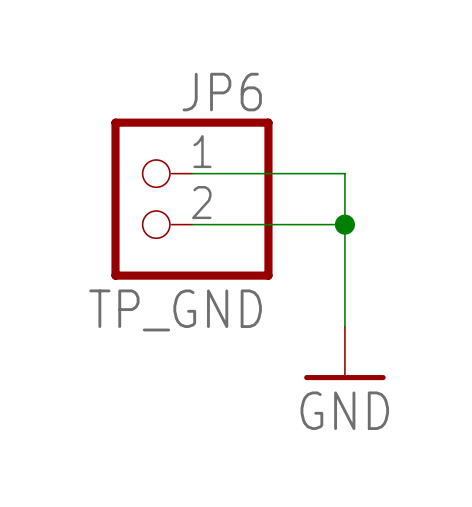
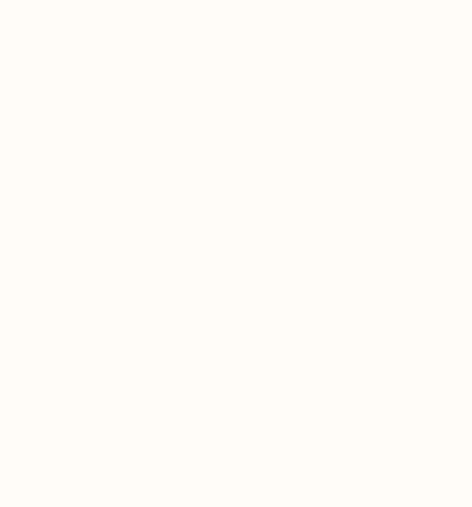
wire: (191, 173) (344, 173) (344, 326) -> none
JP6: TP_GND (191, 199) -> none
wire: (191, 224) (344, 224) -> none
junction: (344, 224) -> none
power symbol: GND (344, 353) -> none

